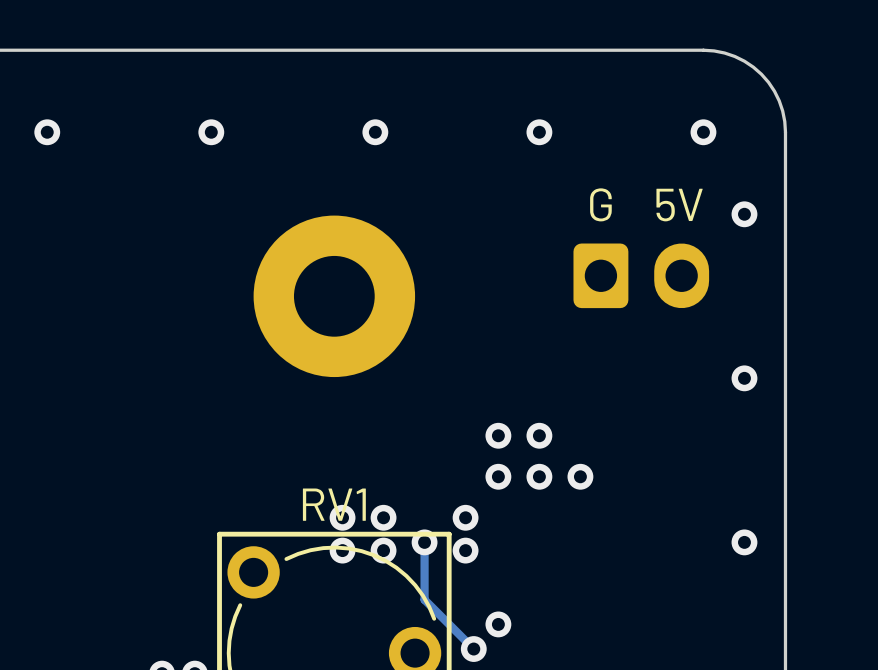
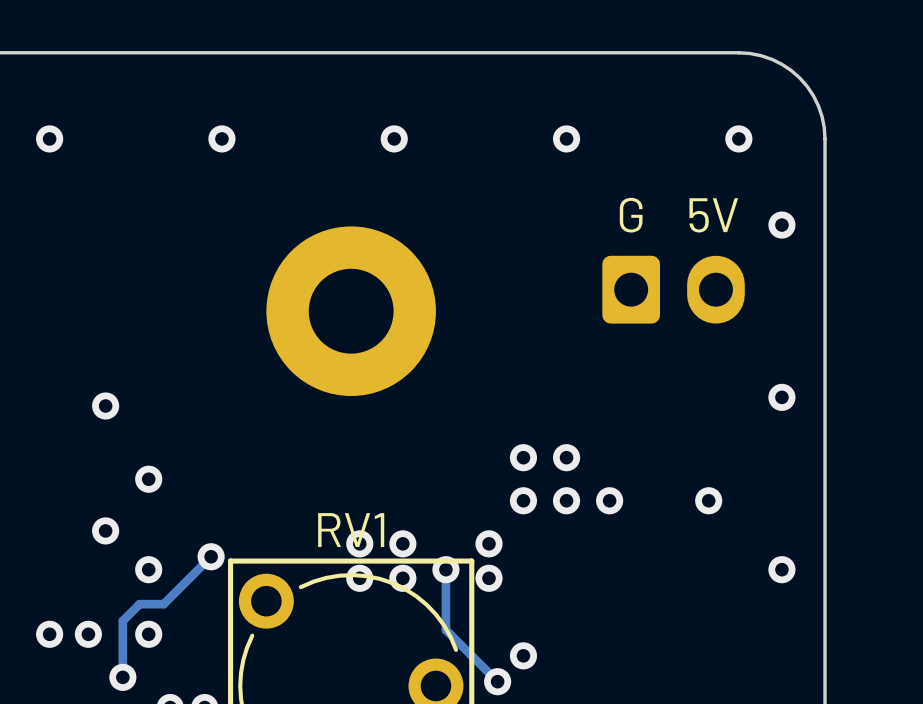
via: none -> (105, 405)
via: none -> (148, 479)
via: none -> (708, 500)
via: none -> (105, 530)
track: none -> (211, 556) (163, 604) (139, 604) (122, 620) (122, 677)
via: none -> (211, 556)
via: none -> (148, 569)
via: none -> (49, 634)
via: none -> (88, 634)
via: none -> (148, 634)
via: none -> (122, 677)

